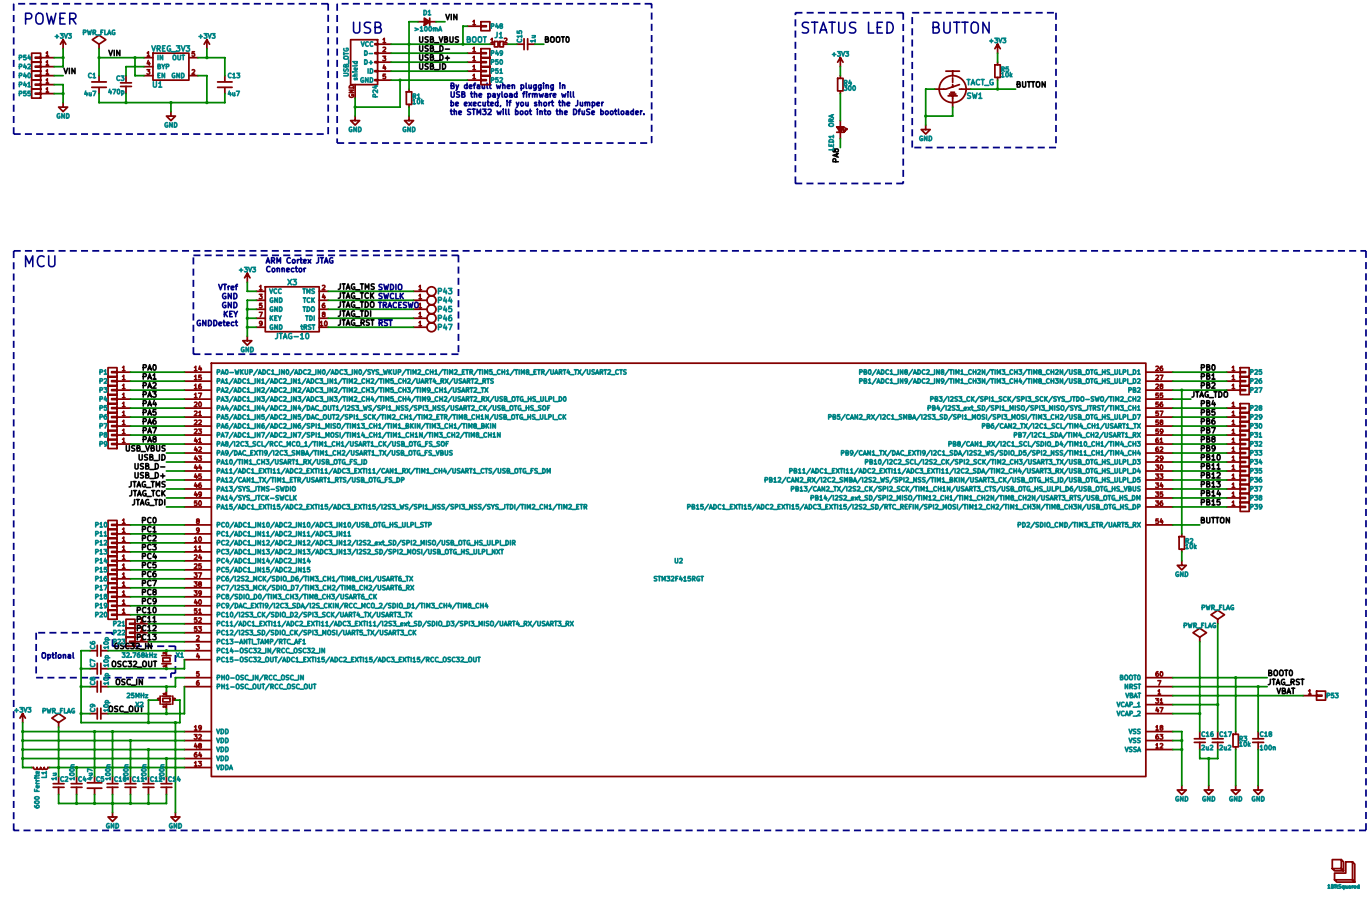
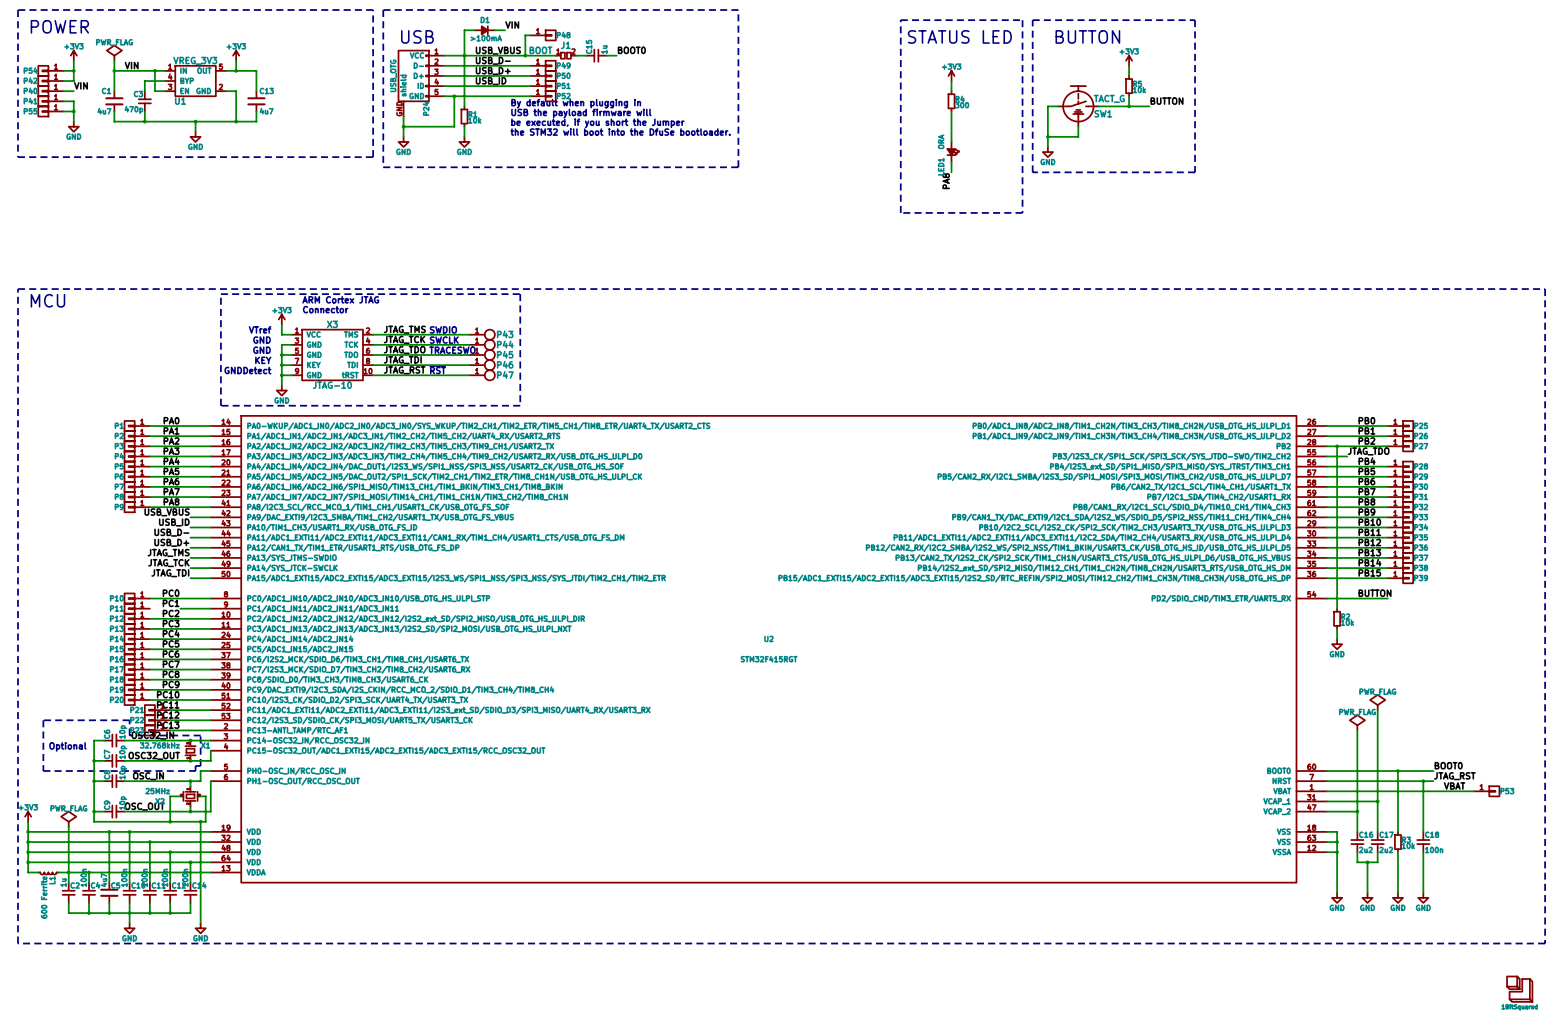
wire: none -> (1357, 598) (1387, 598)
wire: (130, 533) (157, 533) -> none

